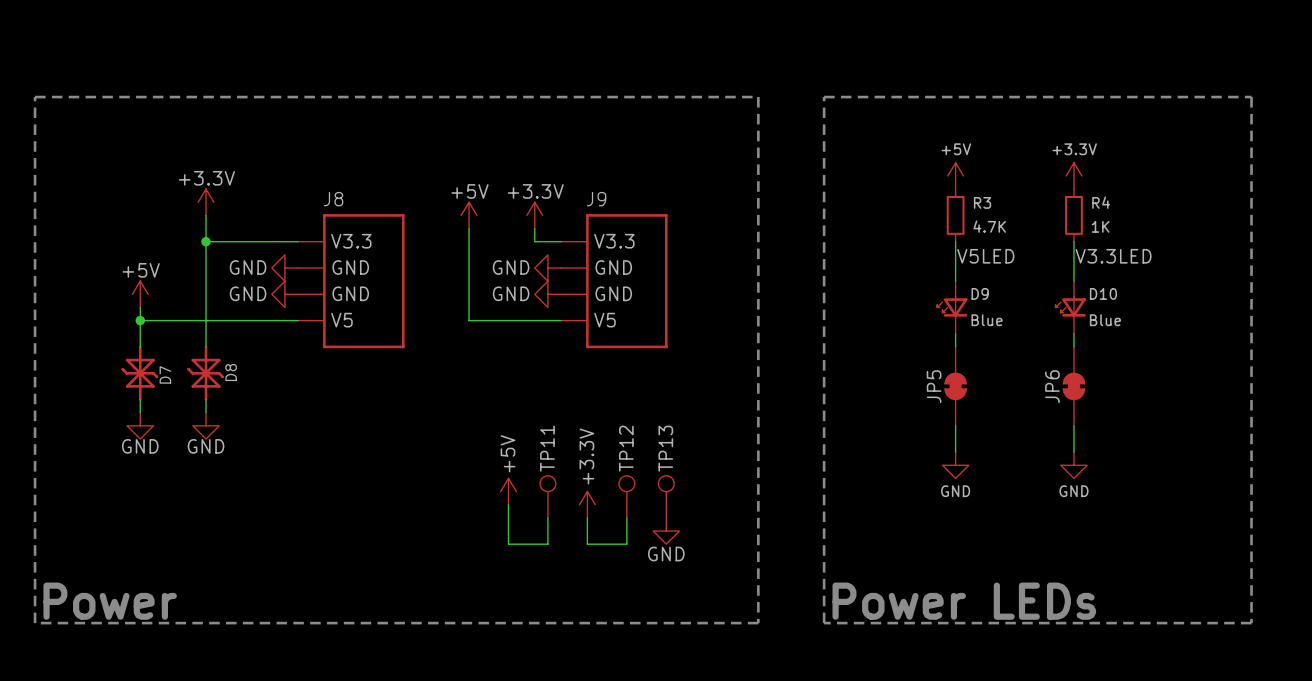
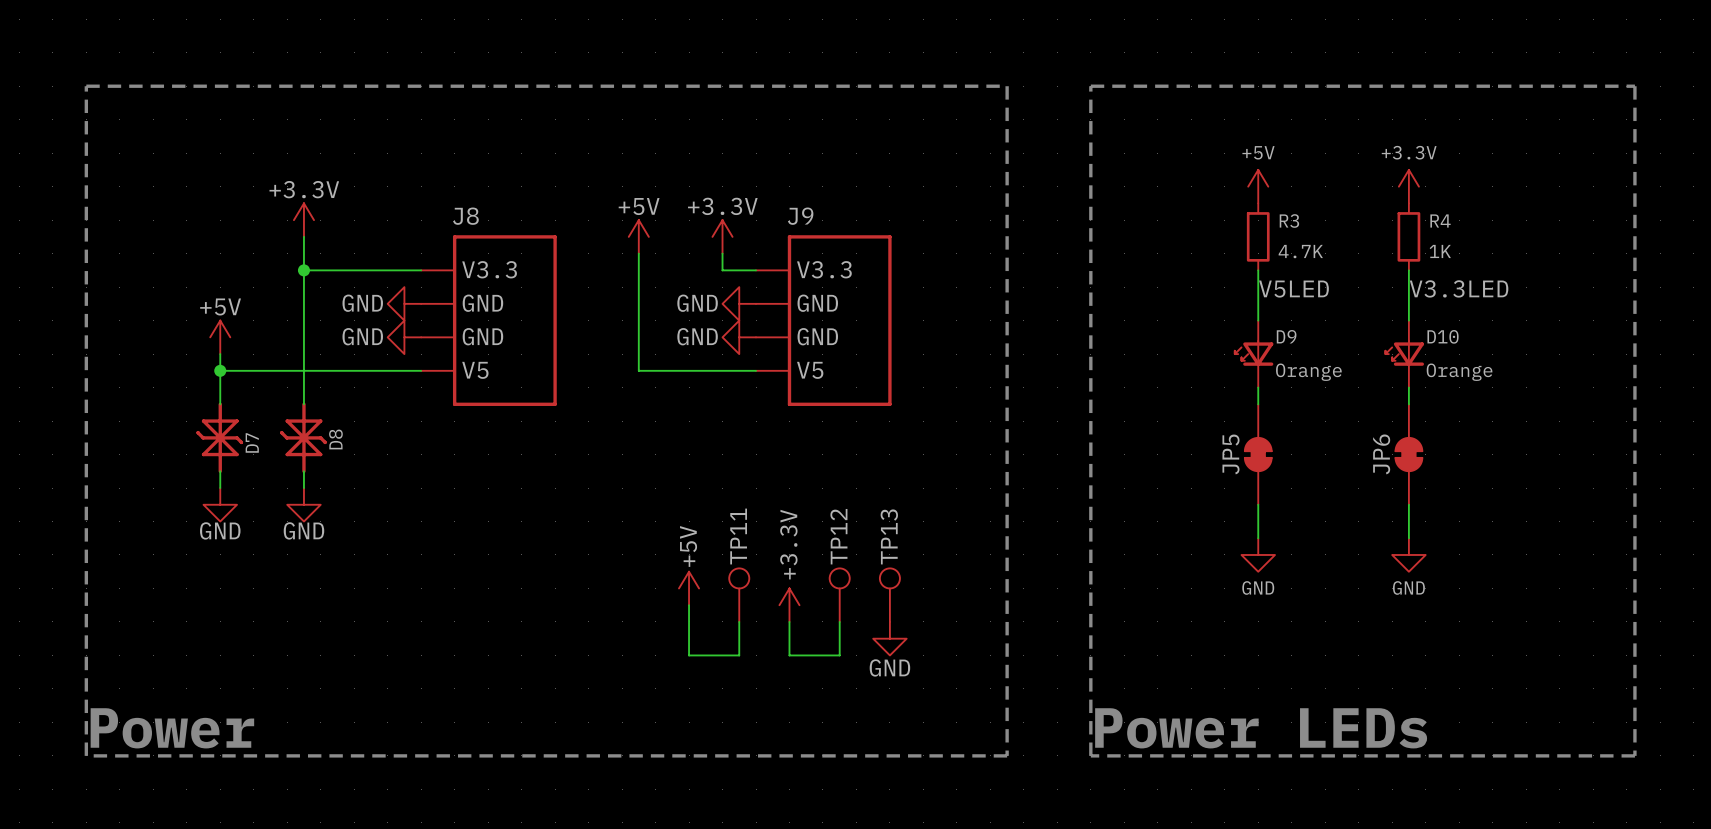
D9 value: Blue (987, 320) -> Orange (1308, 372)
D10 value: Blue (1105, 320) -> Orange (1459, 372)

